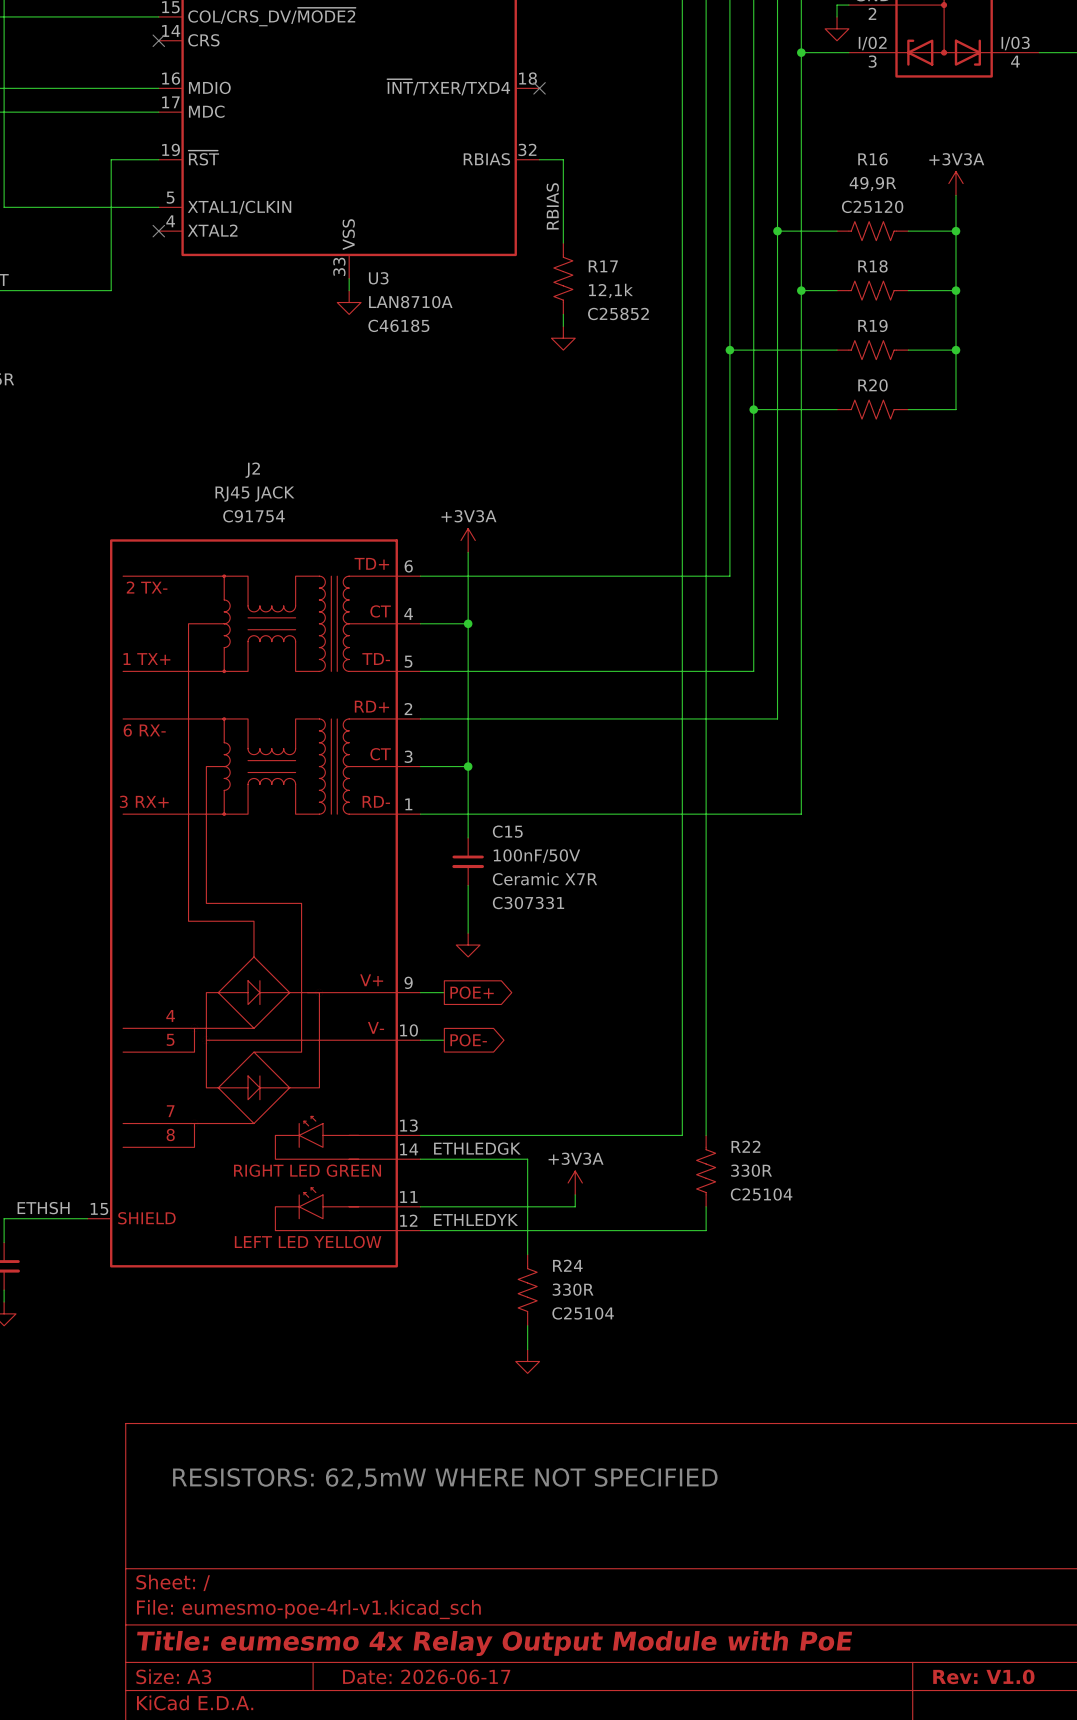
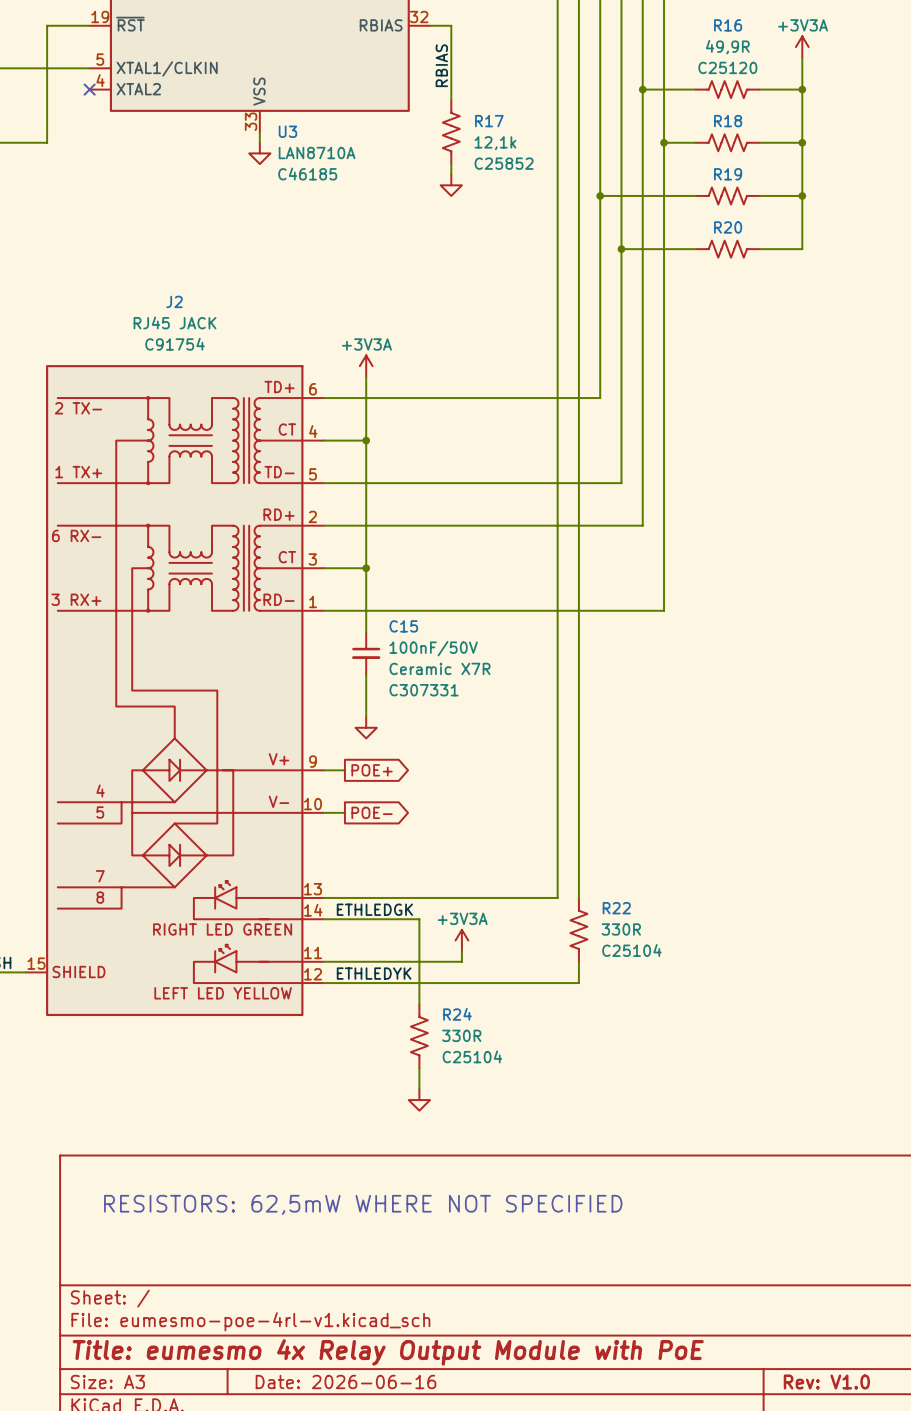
title block: Date: 2026-06-17 (426, 1676) -> Date: 2026-06-16 (345, 1382)

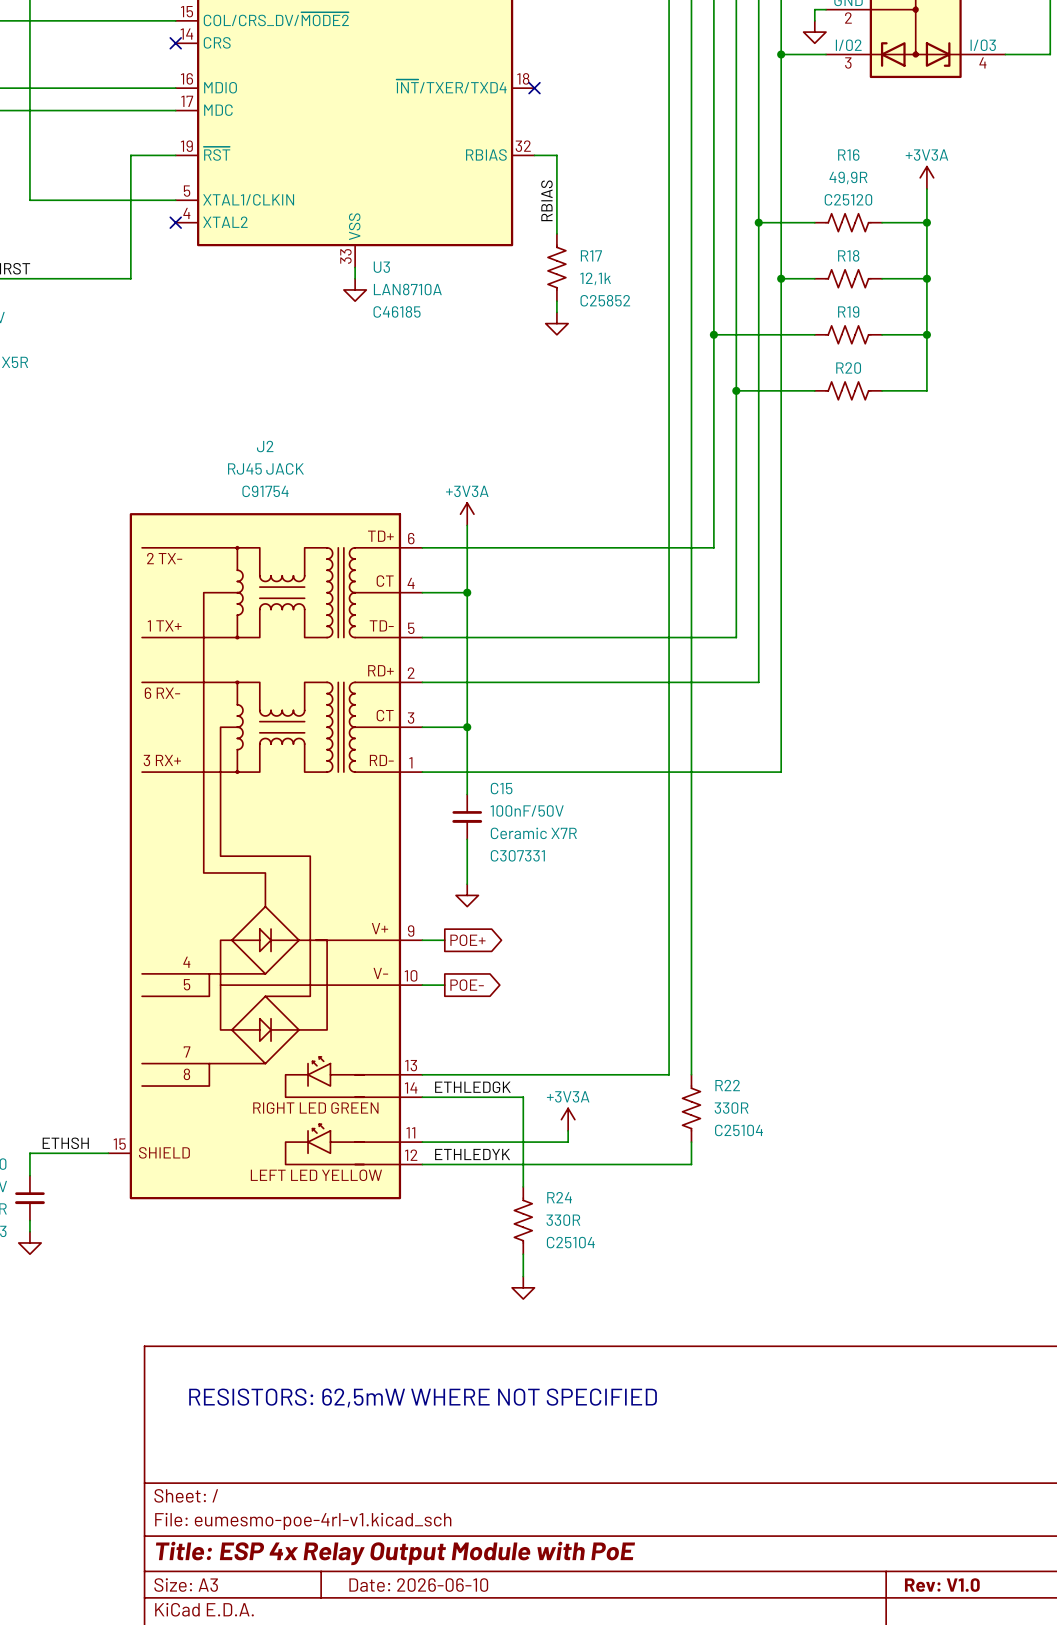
title block: Title: eumesmo 4x Relay Output Module with PoE (388, 1352) -> Title: ESP 4x Relay Output Module with PoE (395, 1553)
title block: Date: 2026-06-16 (345, 1382) -> Date: 2026-06-10 (418, 1585)

